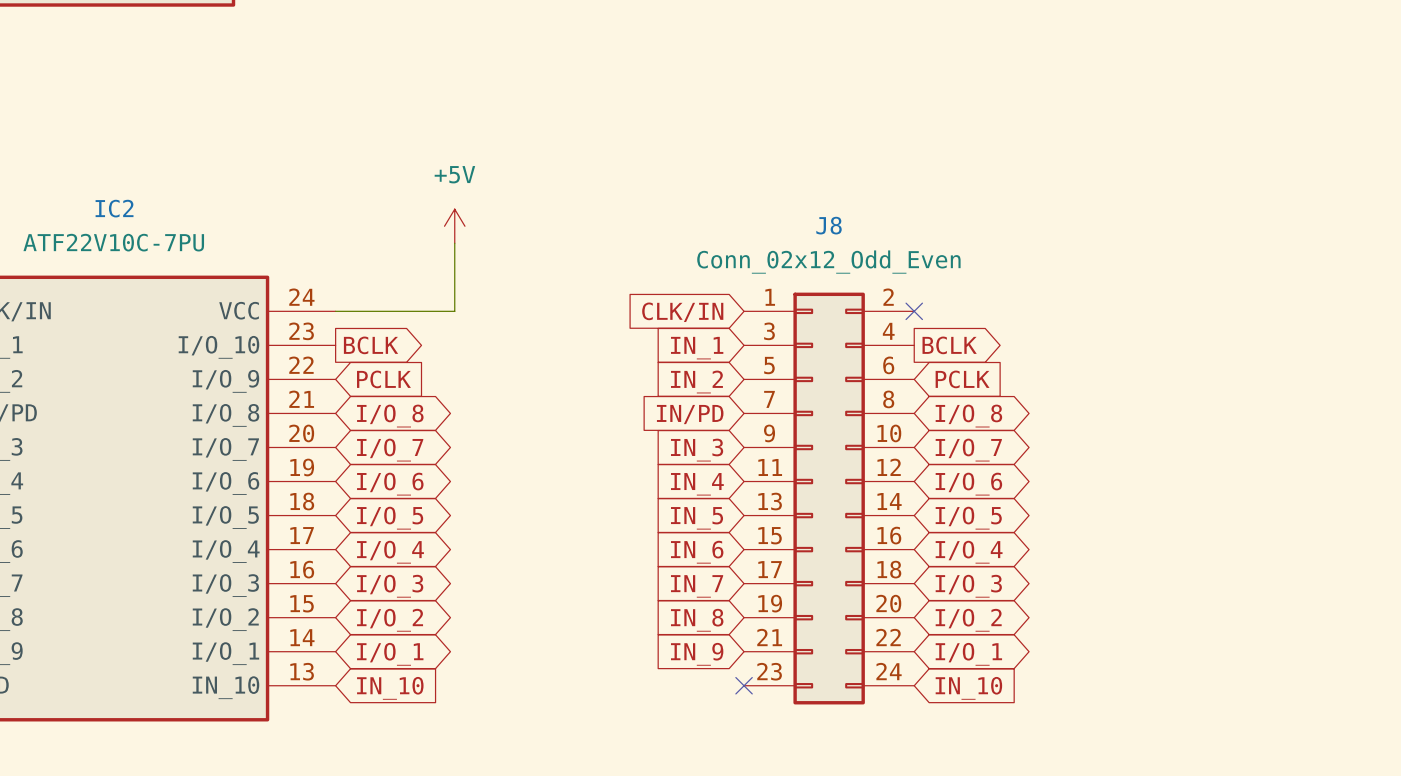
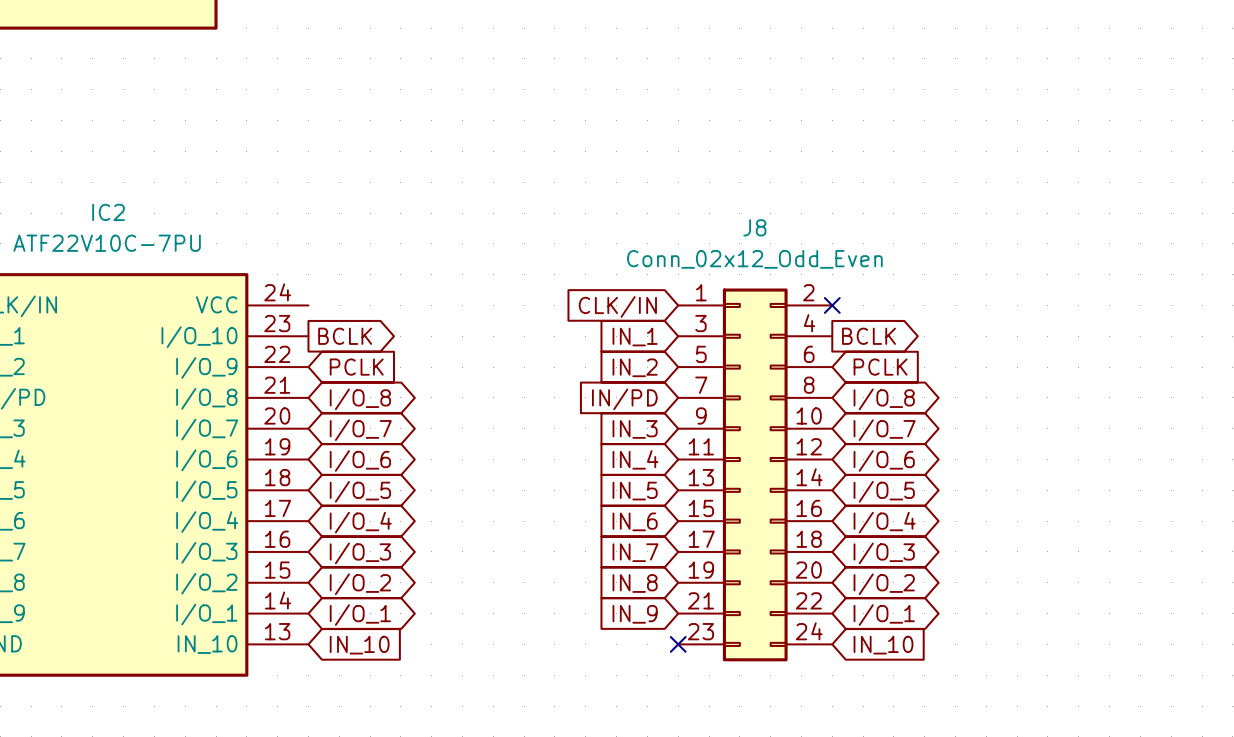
power symbol: +5V (454, 226) -> none
wire: (454, 243) (454, 311) (335, 311) -> none

